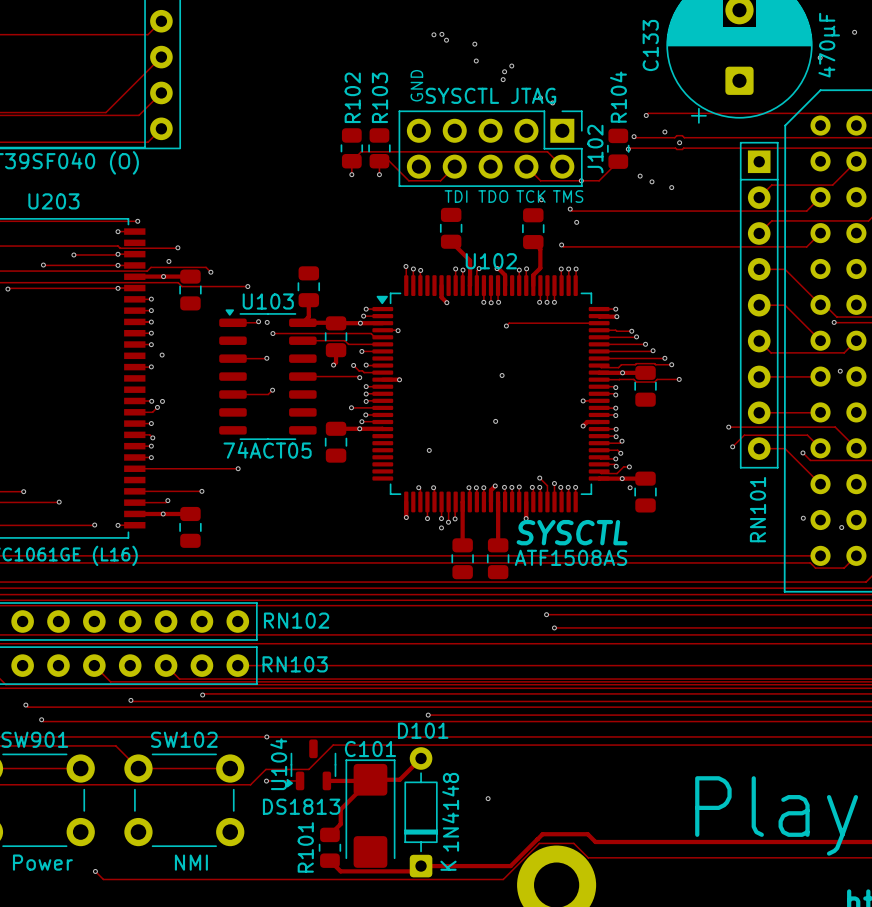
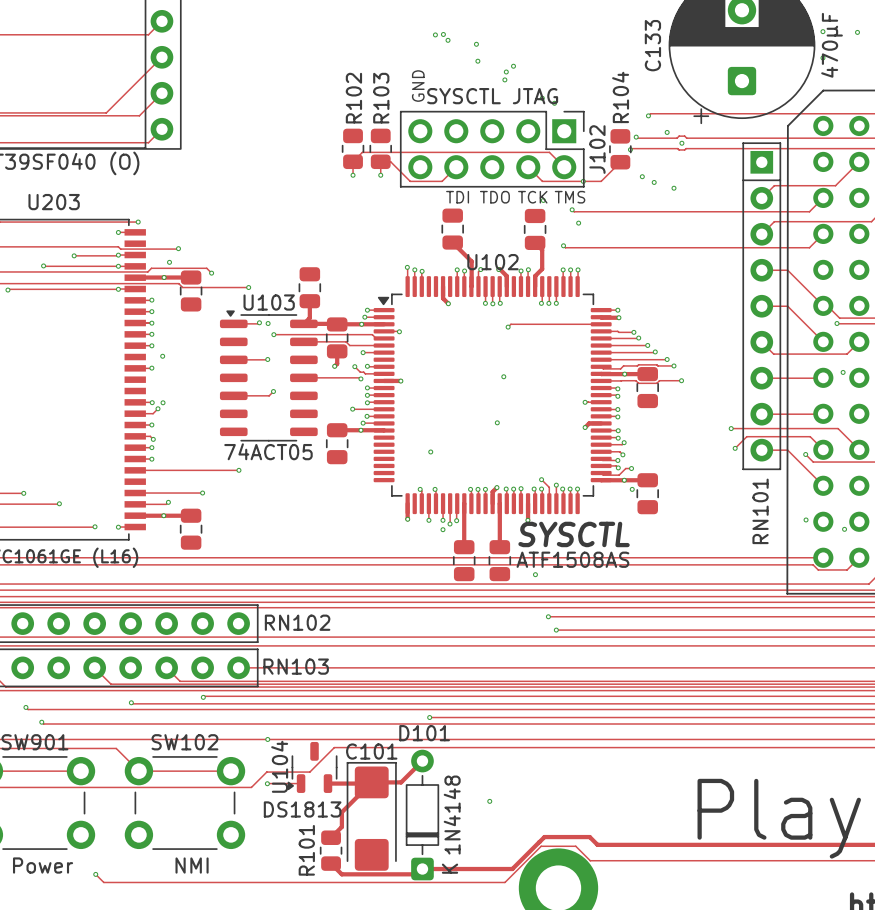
via: none -> (822, 31)
via: none -> (535, 574)

